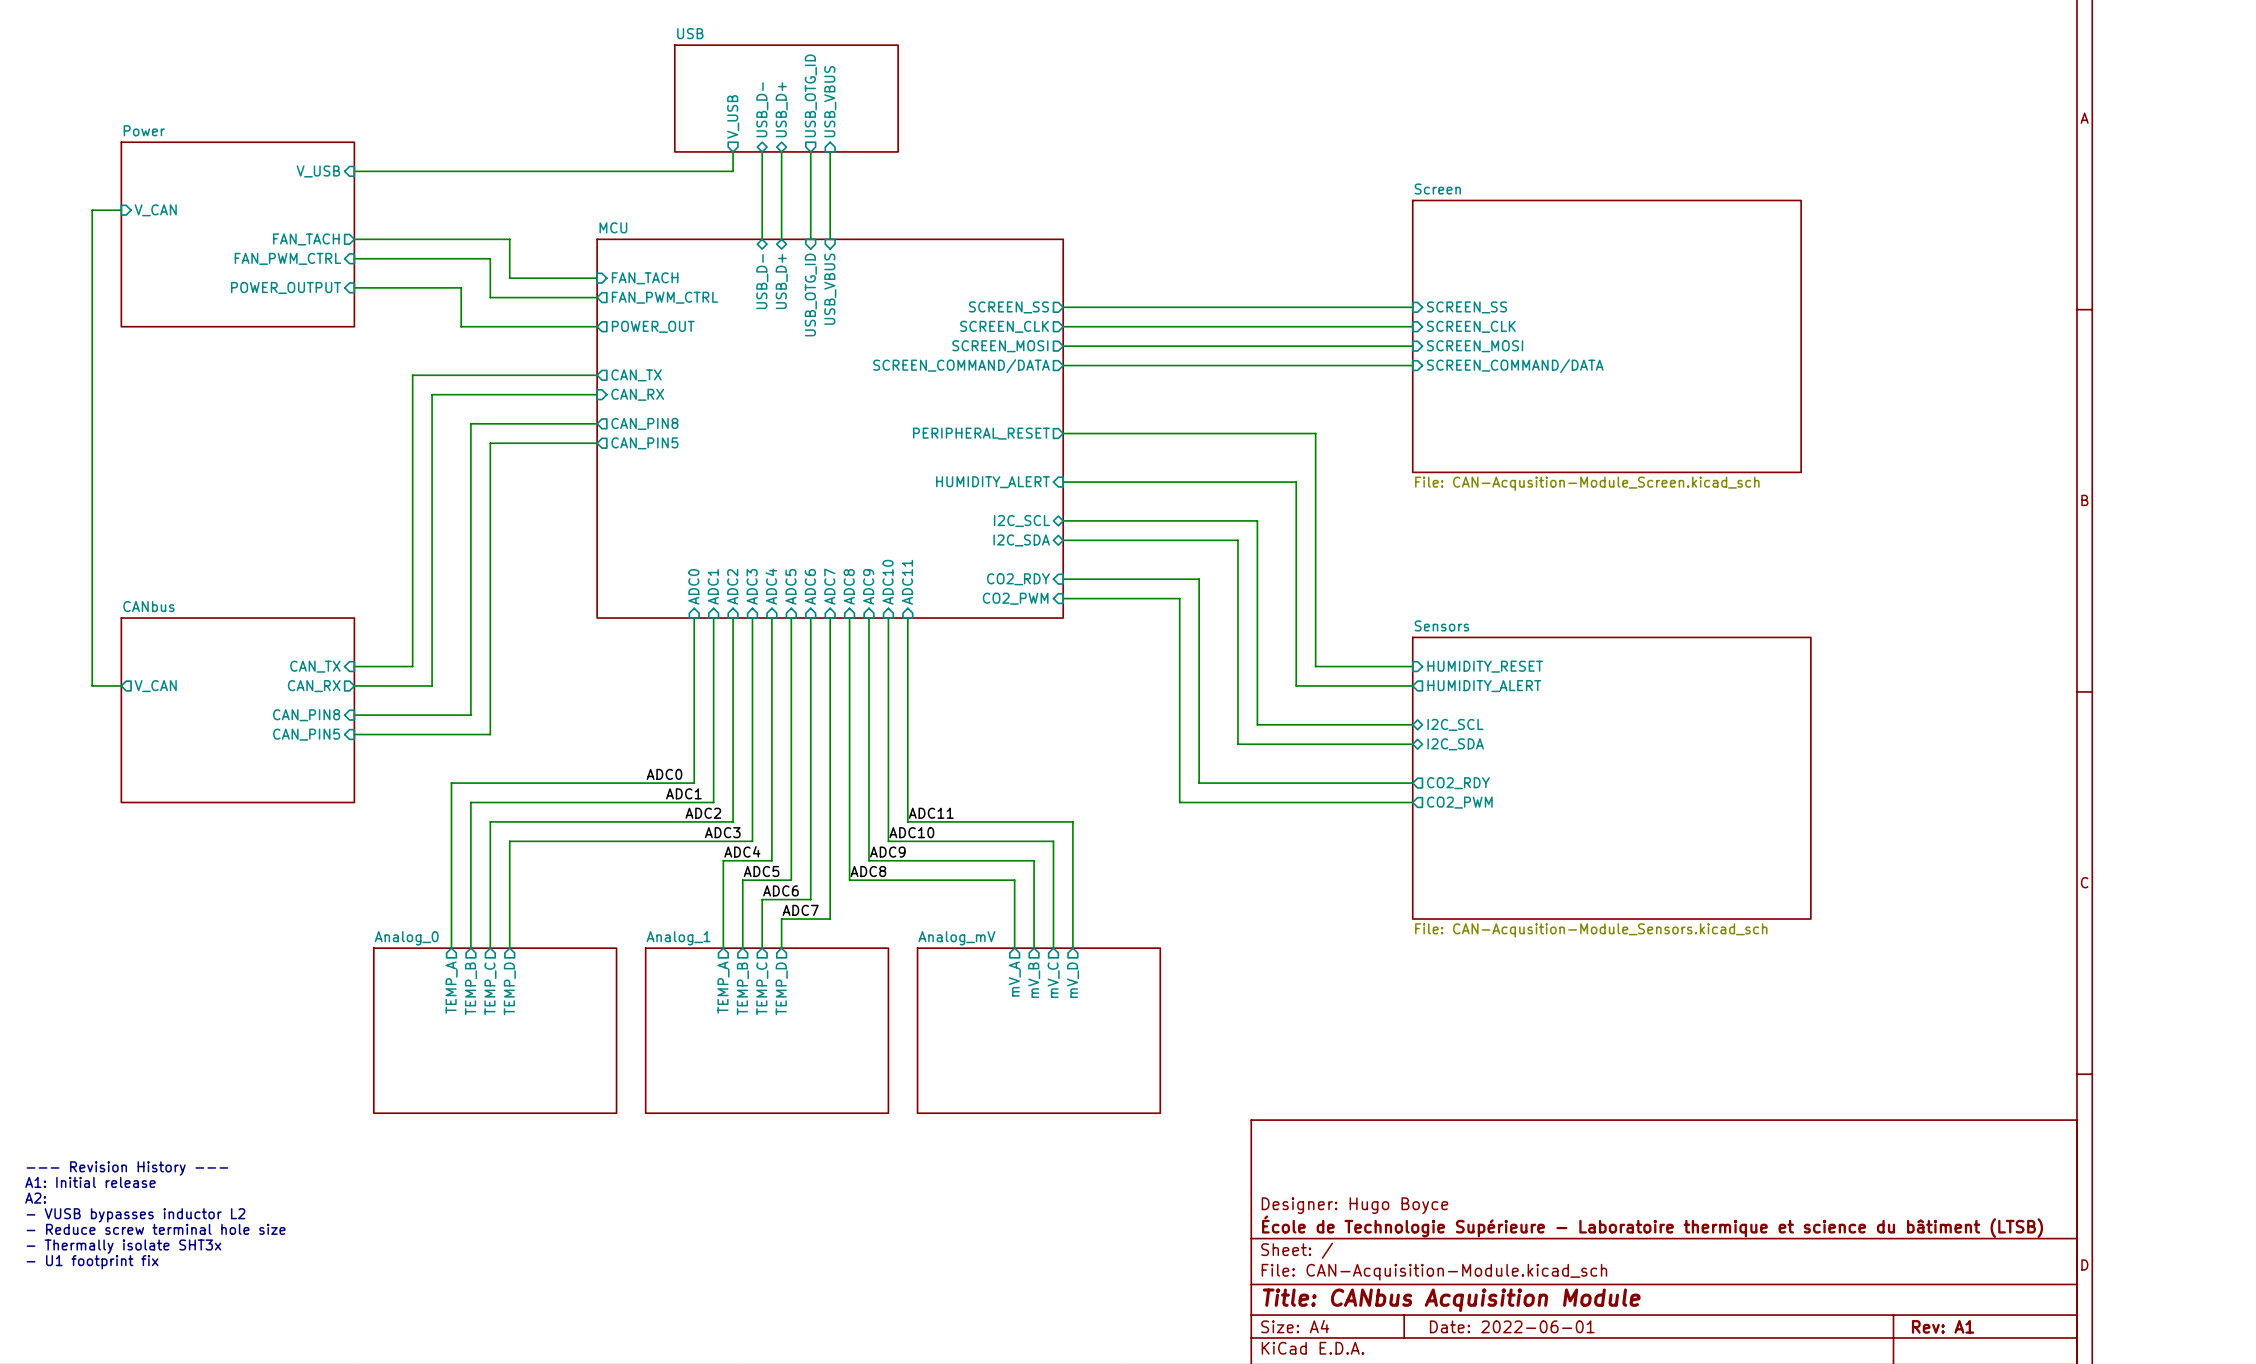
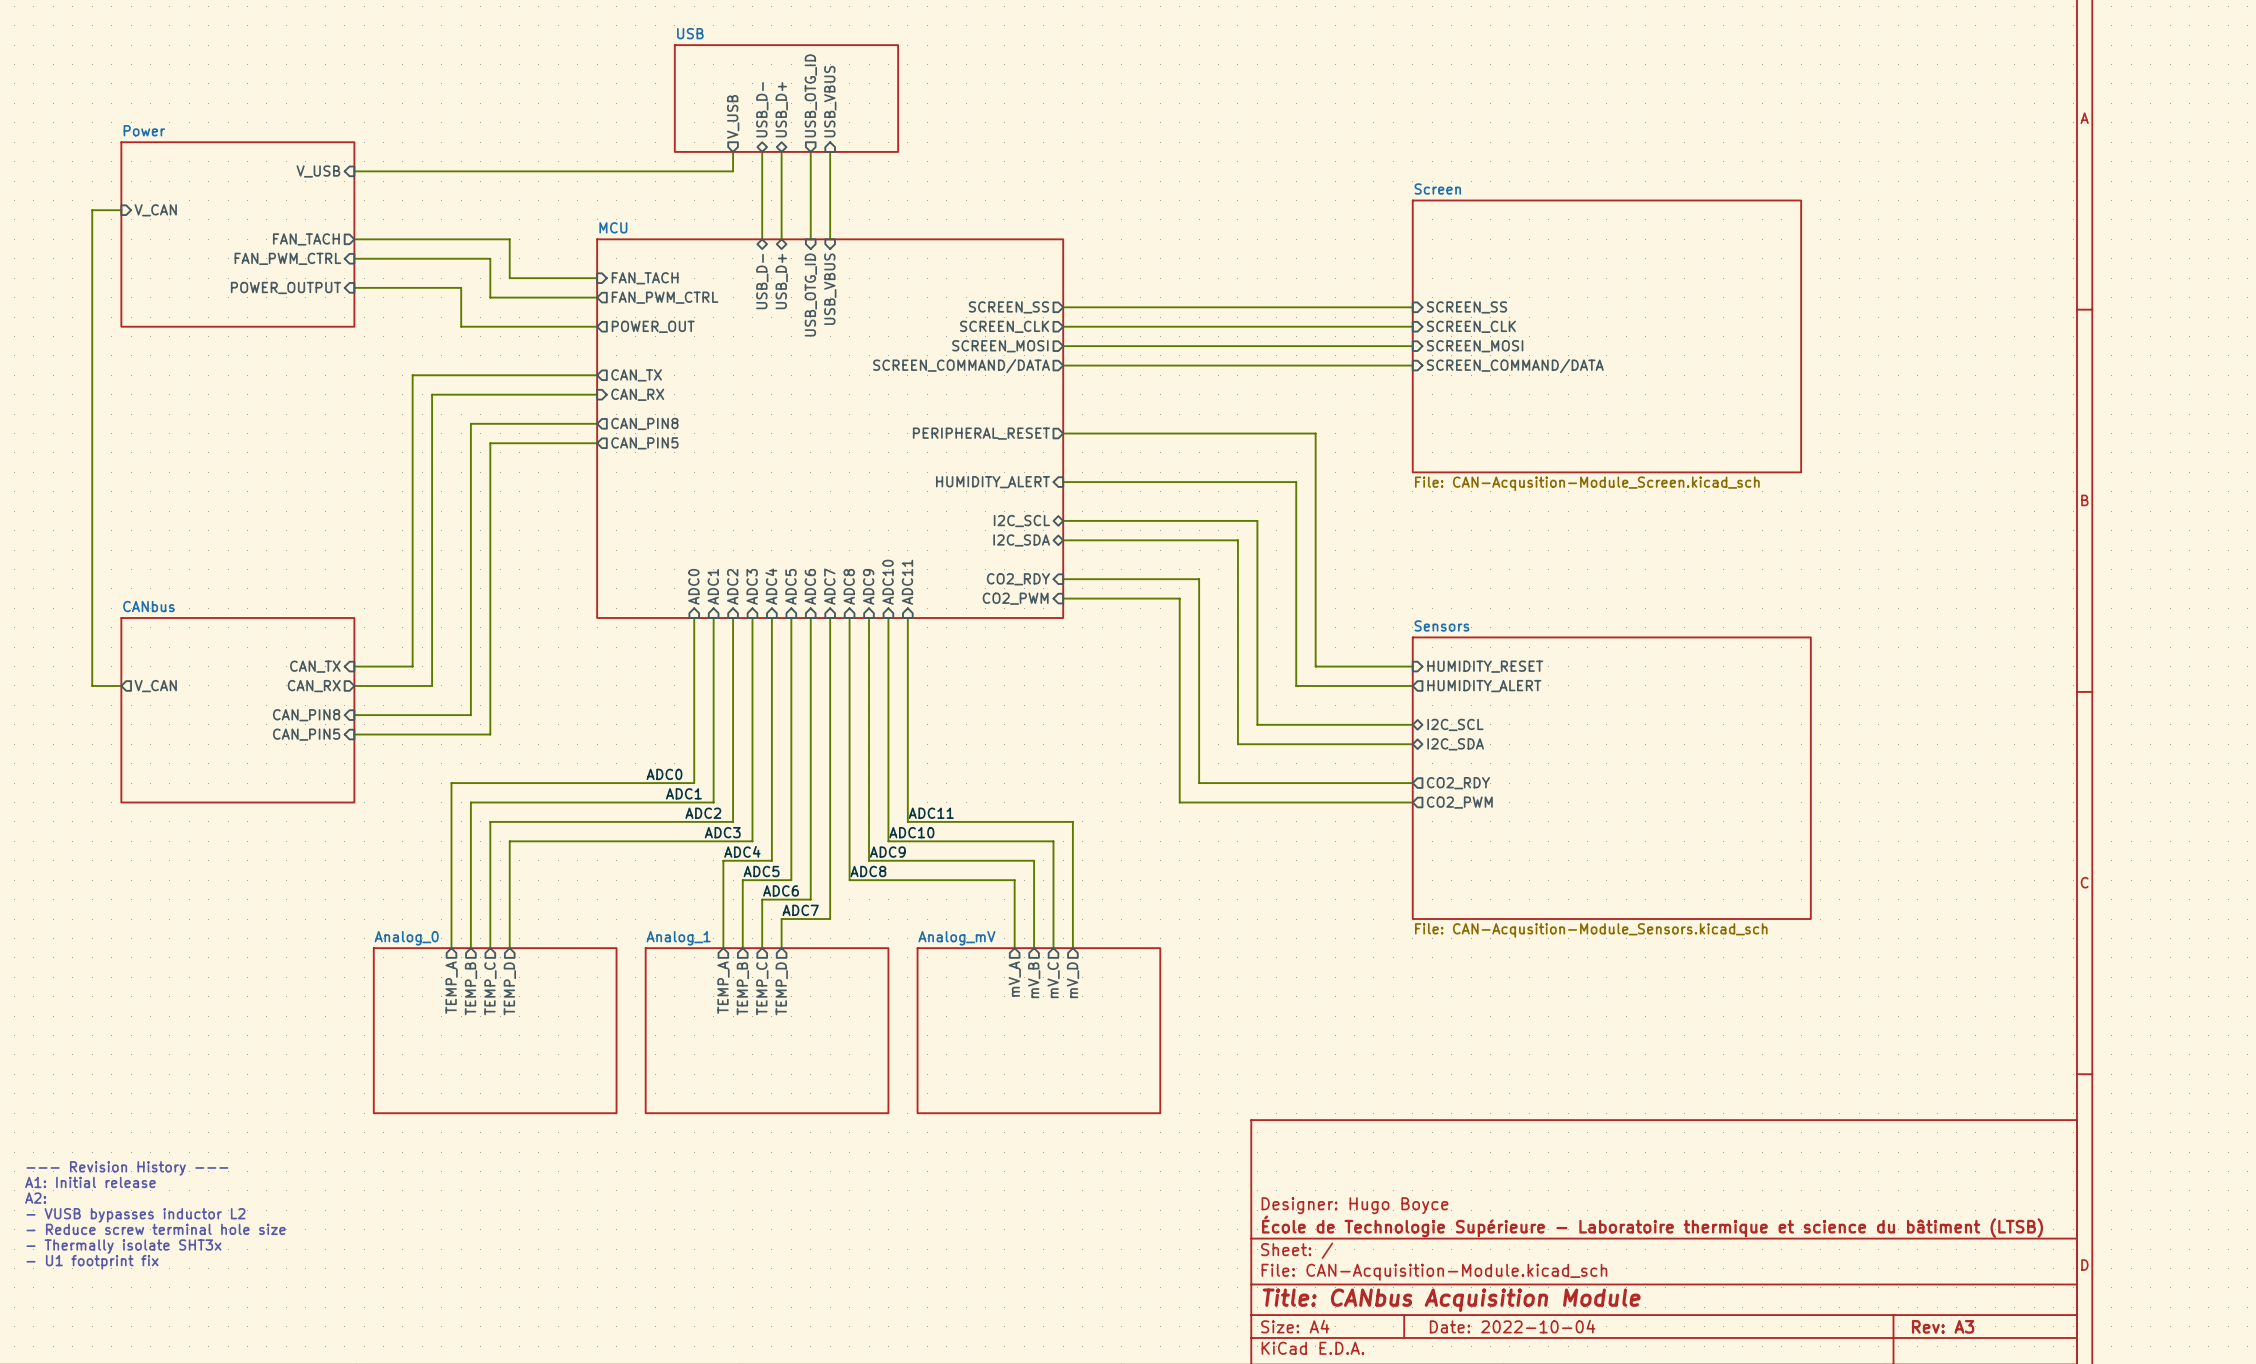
title block: Date: 2022-06-01 (1512, 1326) -> Date: 2022-10-04 (1512, 1326)
title block: Rev: A1 (1943, 1326) -> Rev: A3 (1943, 1326)

